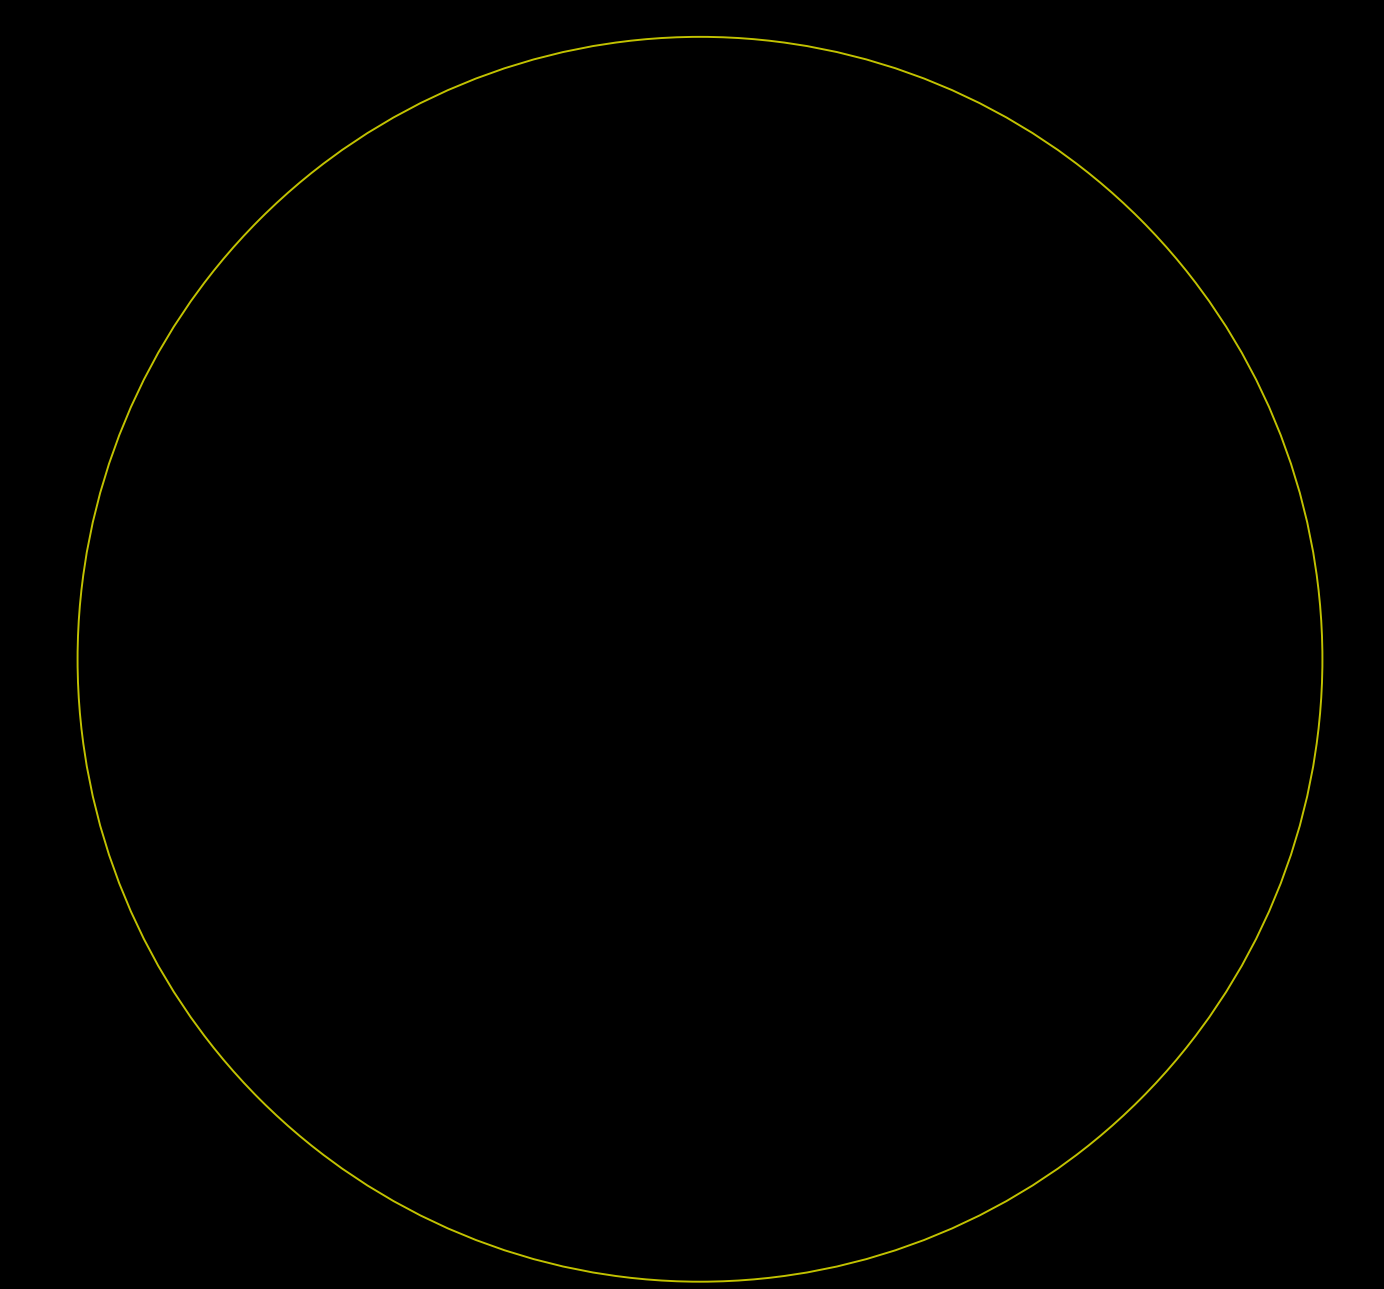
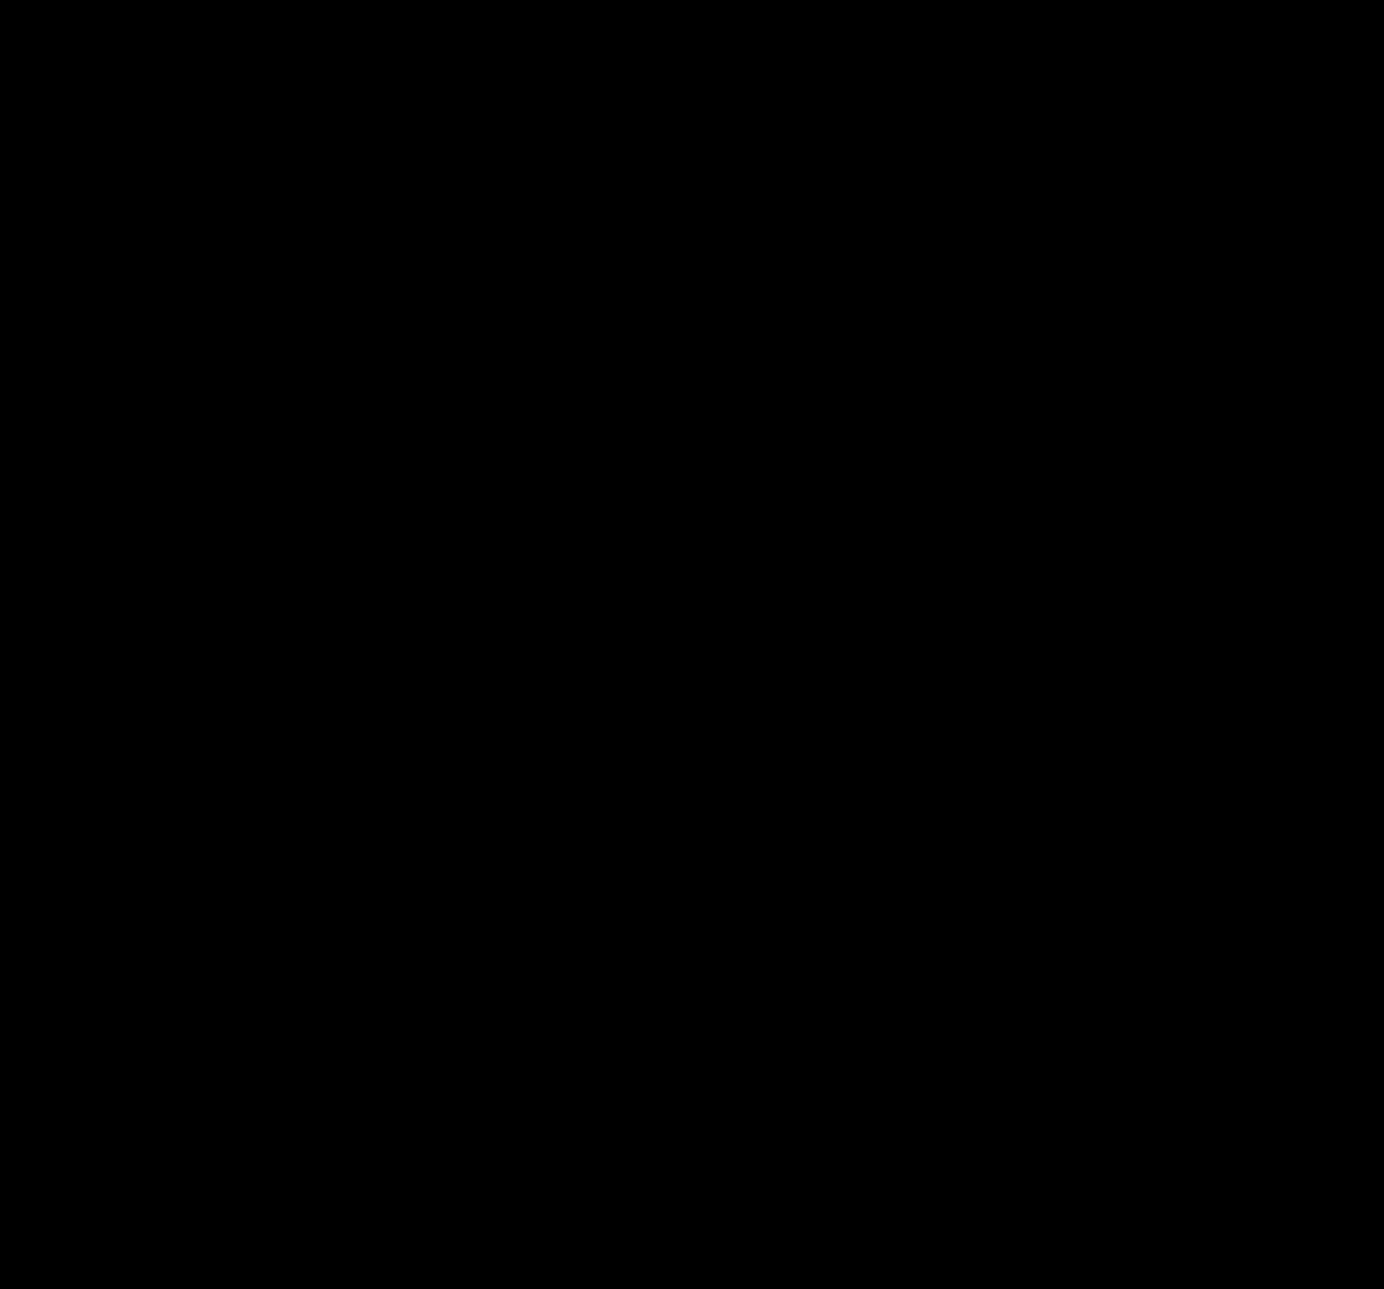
round board edge: [77, 36, 1323, 1283] -> none

